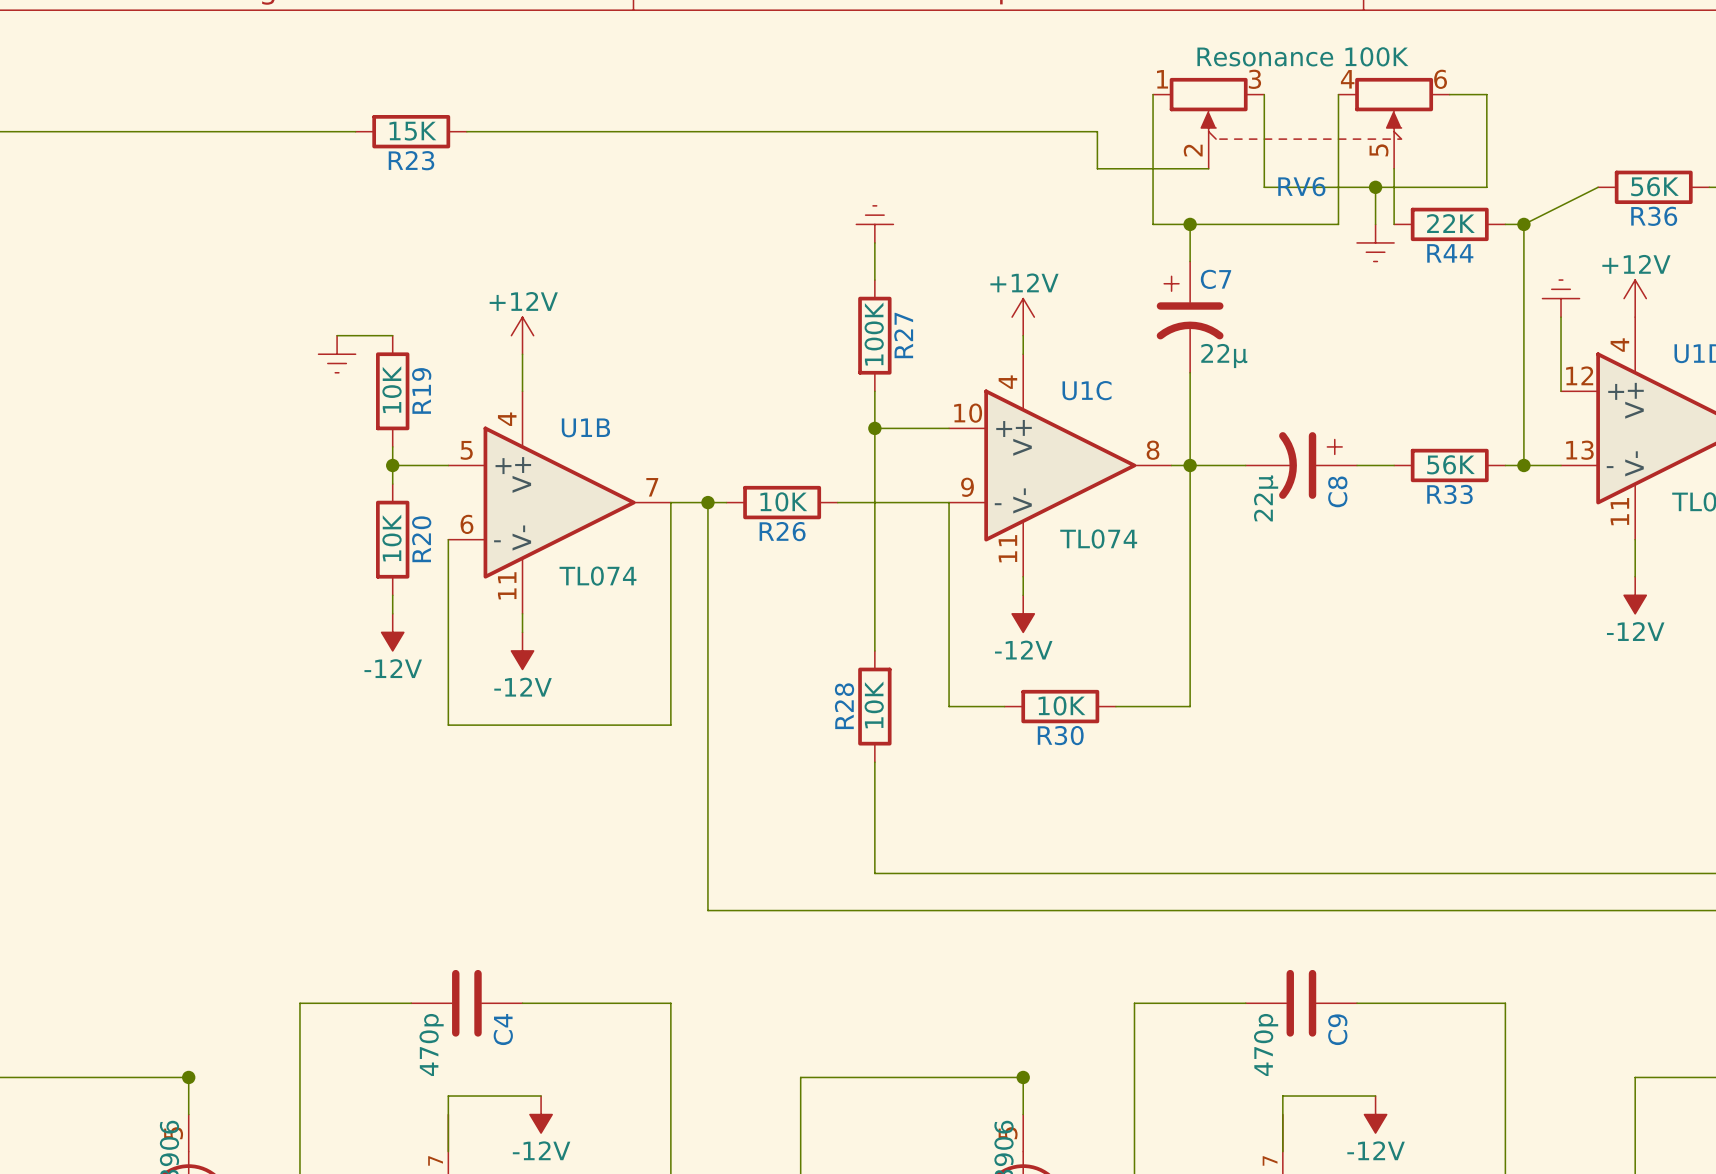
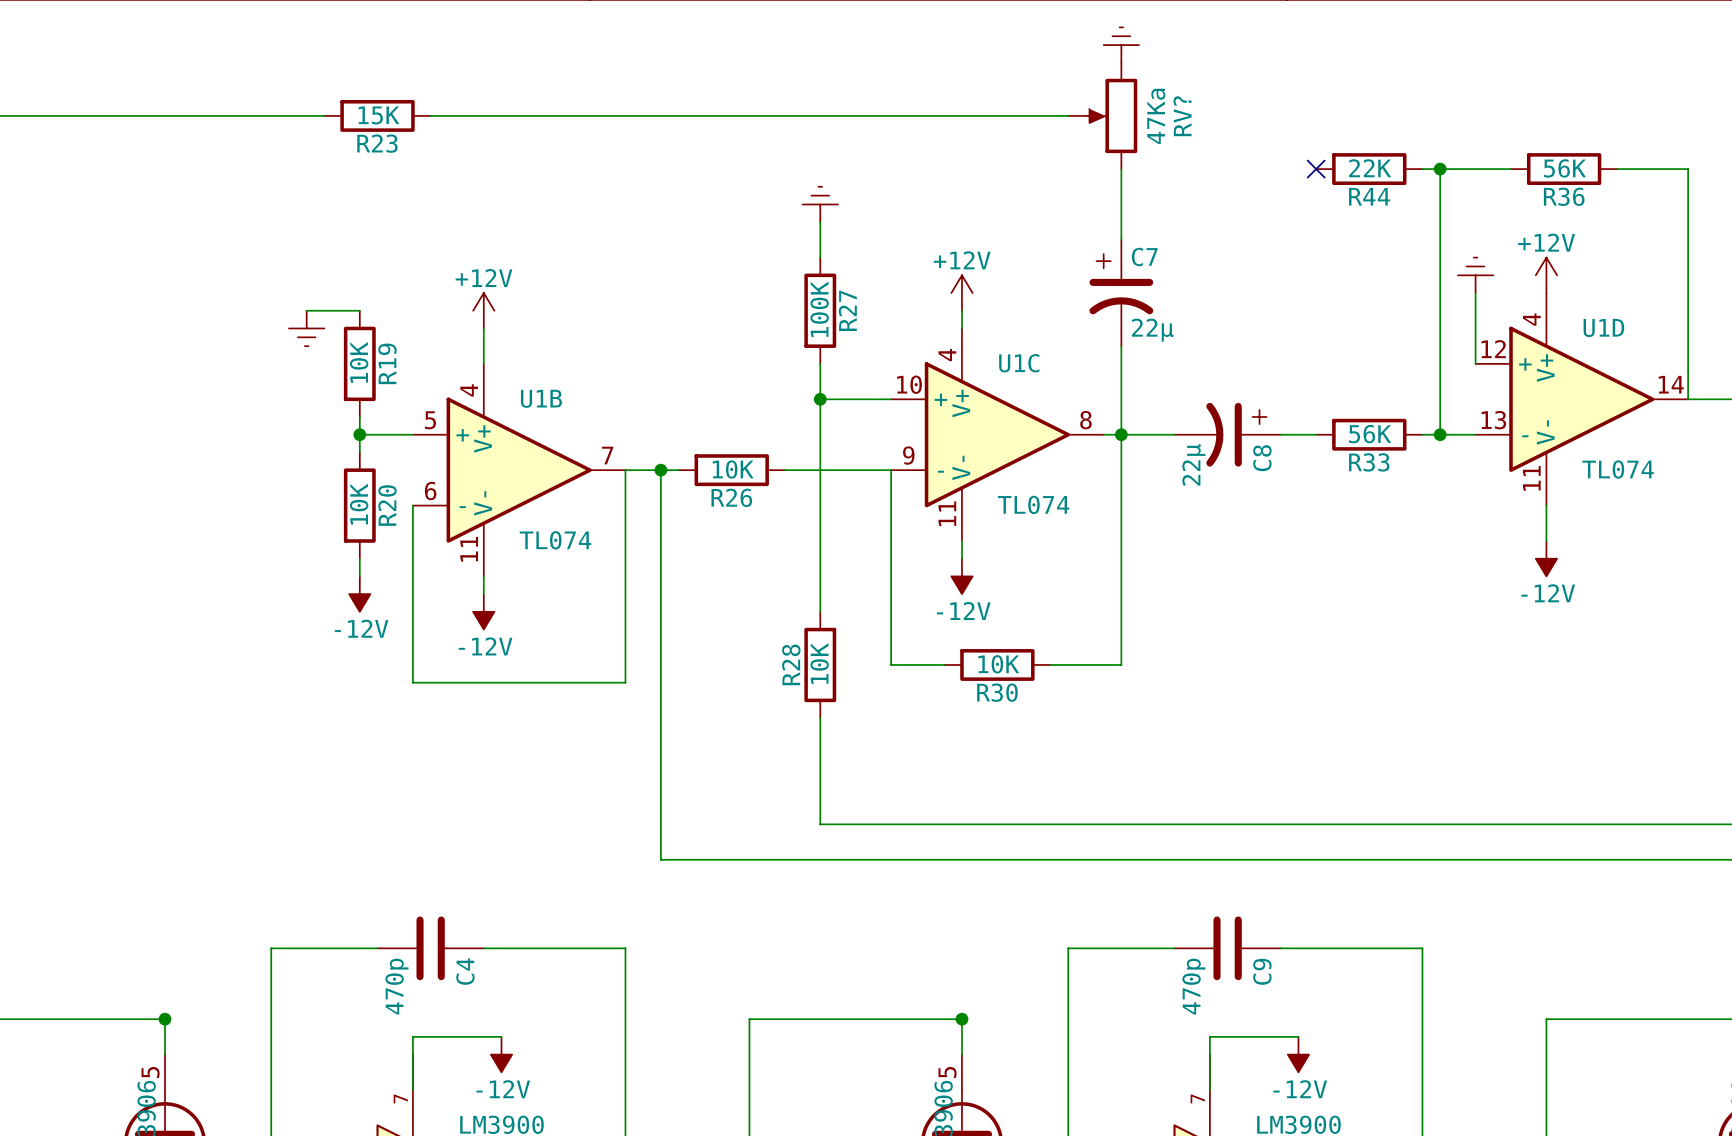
wire: (1153, 94) (1153, 224) (1338, 224) (1338, 94) -> none
wire: (1264, 94) (1264, 187) (1486, 187) (1486, 94) (1449, 94) -> none
RV6: Resonance 100K (1301, 123) -> none
wire: (1097, 131) (1097, 168) (1208, 168) -> (1032, 115) (1068, 115)
RV?: none -> 47Ka (1102, 115)
wire: (1394, 168) (1394, 224) -> none
wire: none -> (1121, 169) (1121, 204)
wire: (1375, 187) (1375, 224) -> (1440, 169) (1440, 204)
junction: (1375, 187) -> none
no-connect mark: none -> (1316, 169)
wire: (1598, 187) (1523, 224) (1505, 224) -> (1511, 169) (1422, 169)
junction: (1190, 224) -> none
R44 position: (1449, 224) -> (1369, 169)
junction position: (1523, 224) -> (1440, 169)
power symbol rotation: 0° (1375, 242) -> 180° (1121, 45)
power symbol position: (1375, 242) -> (1121, 45)

